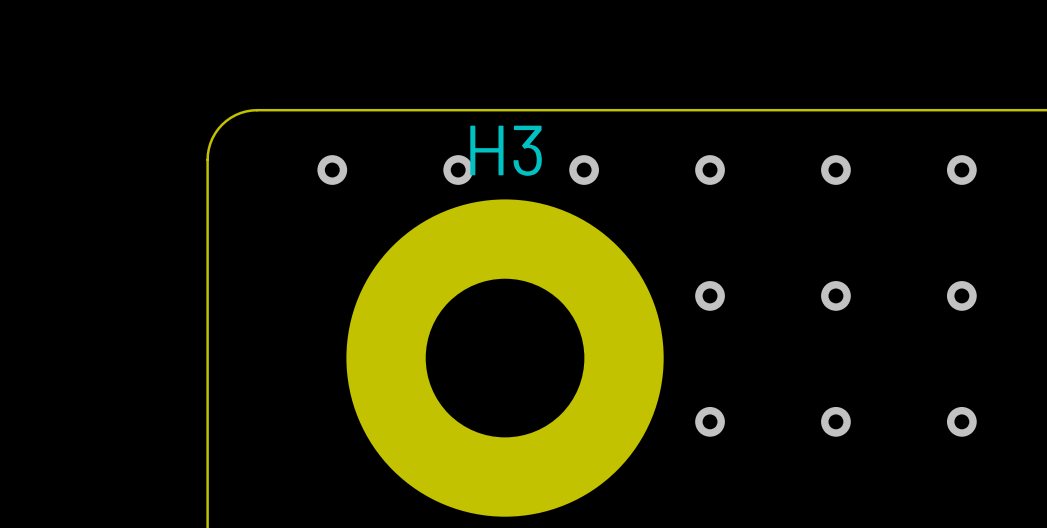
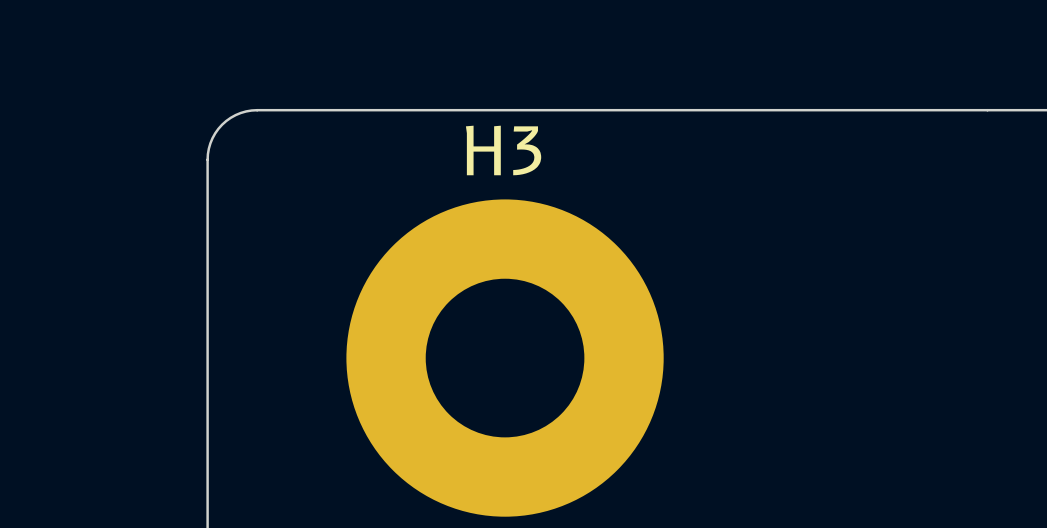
via: (332, 170) -> none
via: (458, 170) -> none
via: (584, 170) -> none
via: (710, 170) -> none
via: (835, 170) -> none
via: (961, 170) -> none
via: (710, 295) -> none
via: (835, 295) -> none
via: (961, 295) -> none
via: (710, 421) -> none
via: (835, 421) -> none
via: (961, 421) -> none

